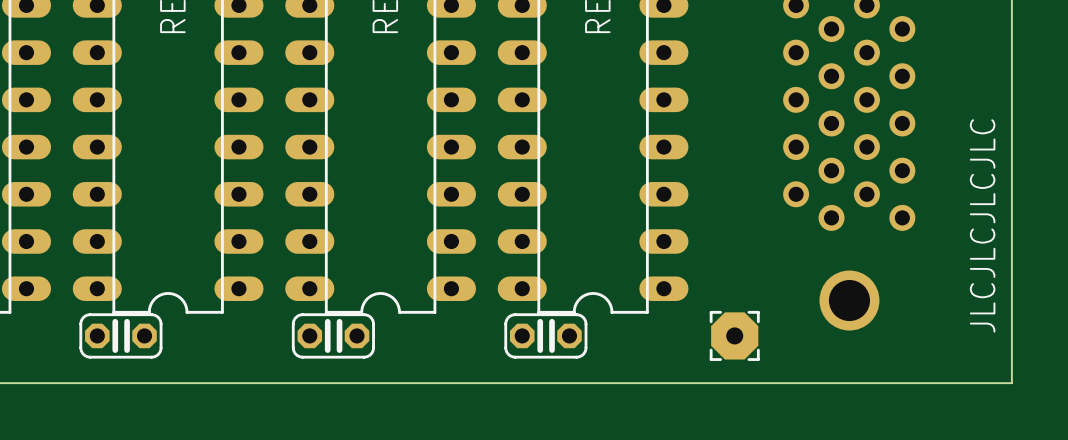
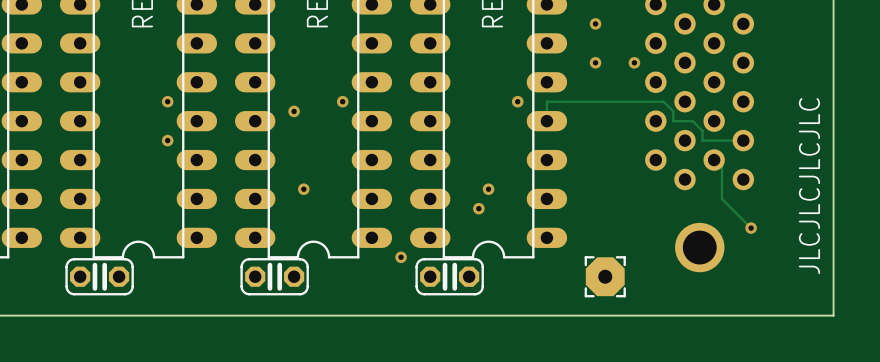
via: none -> (595, 23)
via: none -> (595, 62)
via: none -> (634, 62)
via: none -> (167, 101)
via: none -> (342, 101)
via: none -> (517, 101)
via: none -> (294, 111)
track: none -> (546, 121) (546, 101) (663, 101) (673, 111) (673, 121) (692, 121) (702, 130) (702, 140) (743, 140)
via: none -> (167, 140)
track: none -> (714, 160) (721, 160) (721, 198) (751, 228)
via: none -> (303, 189)
via: none -> (488, 189)
via: none -> (478, 208)
via: none -> (751, 228)
via: none -> (401, 257)

